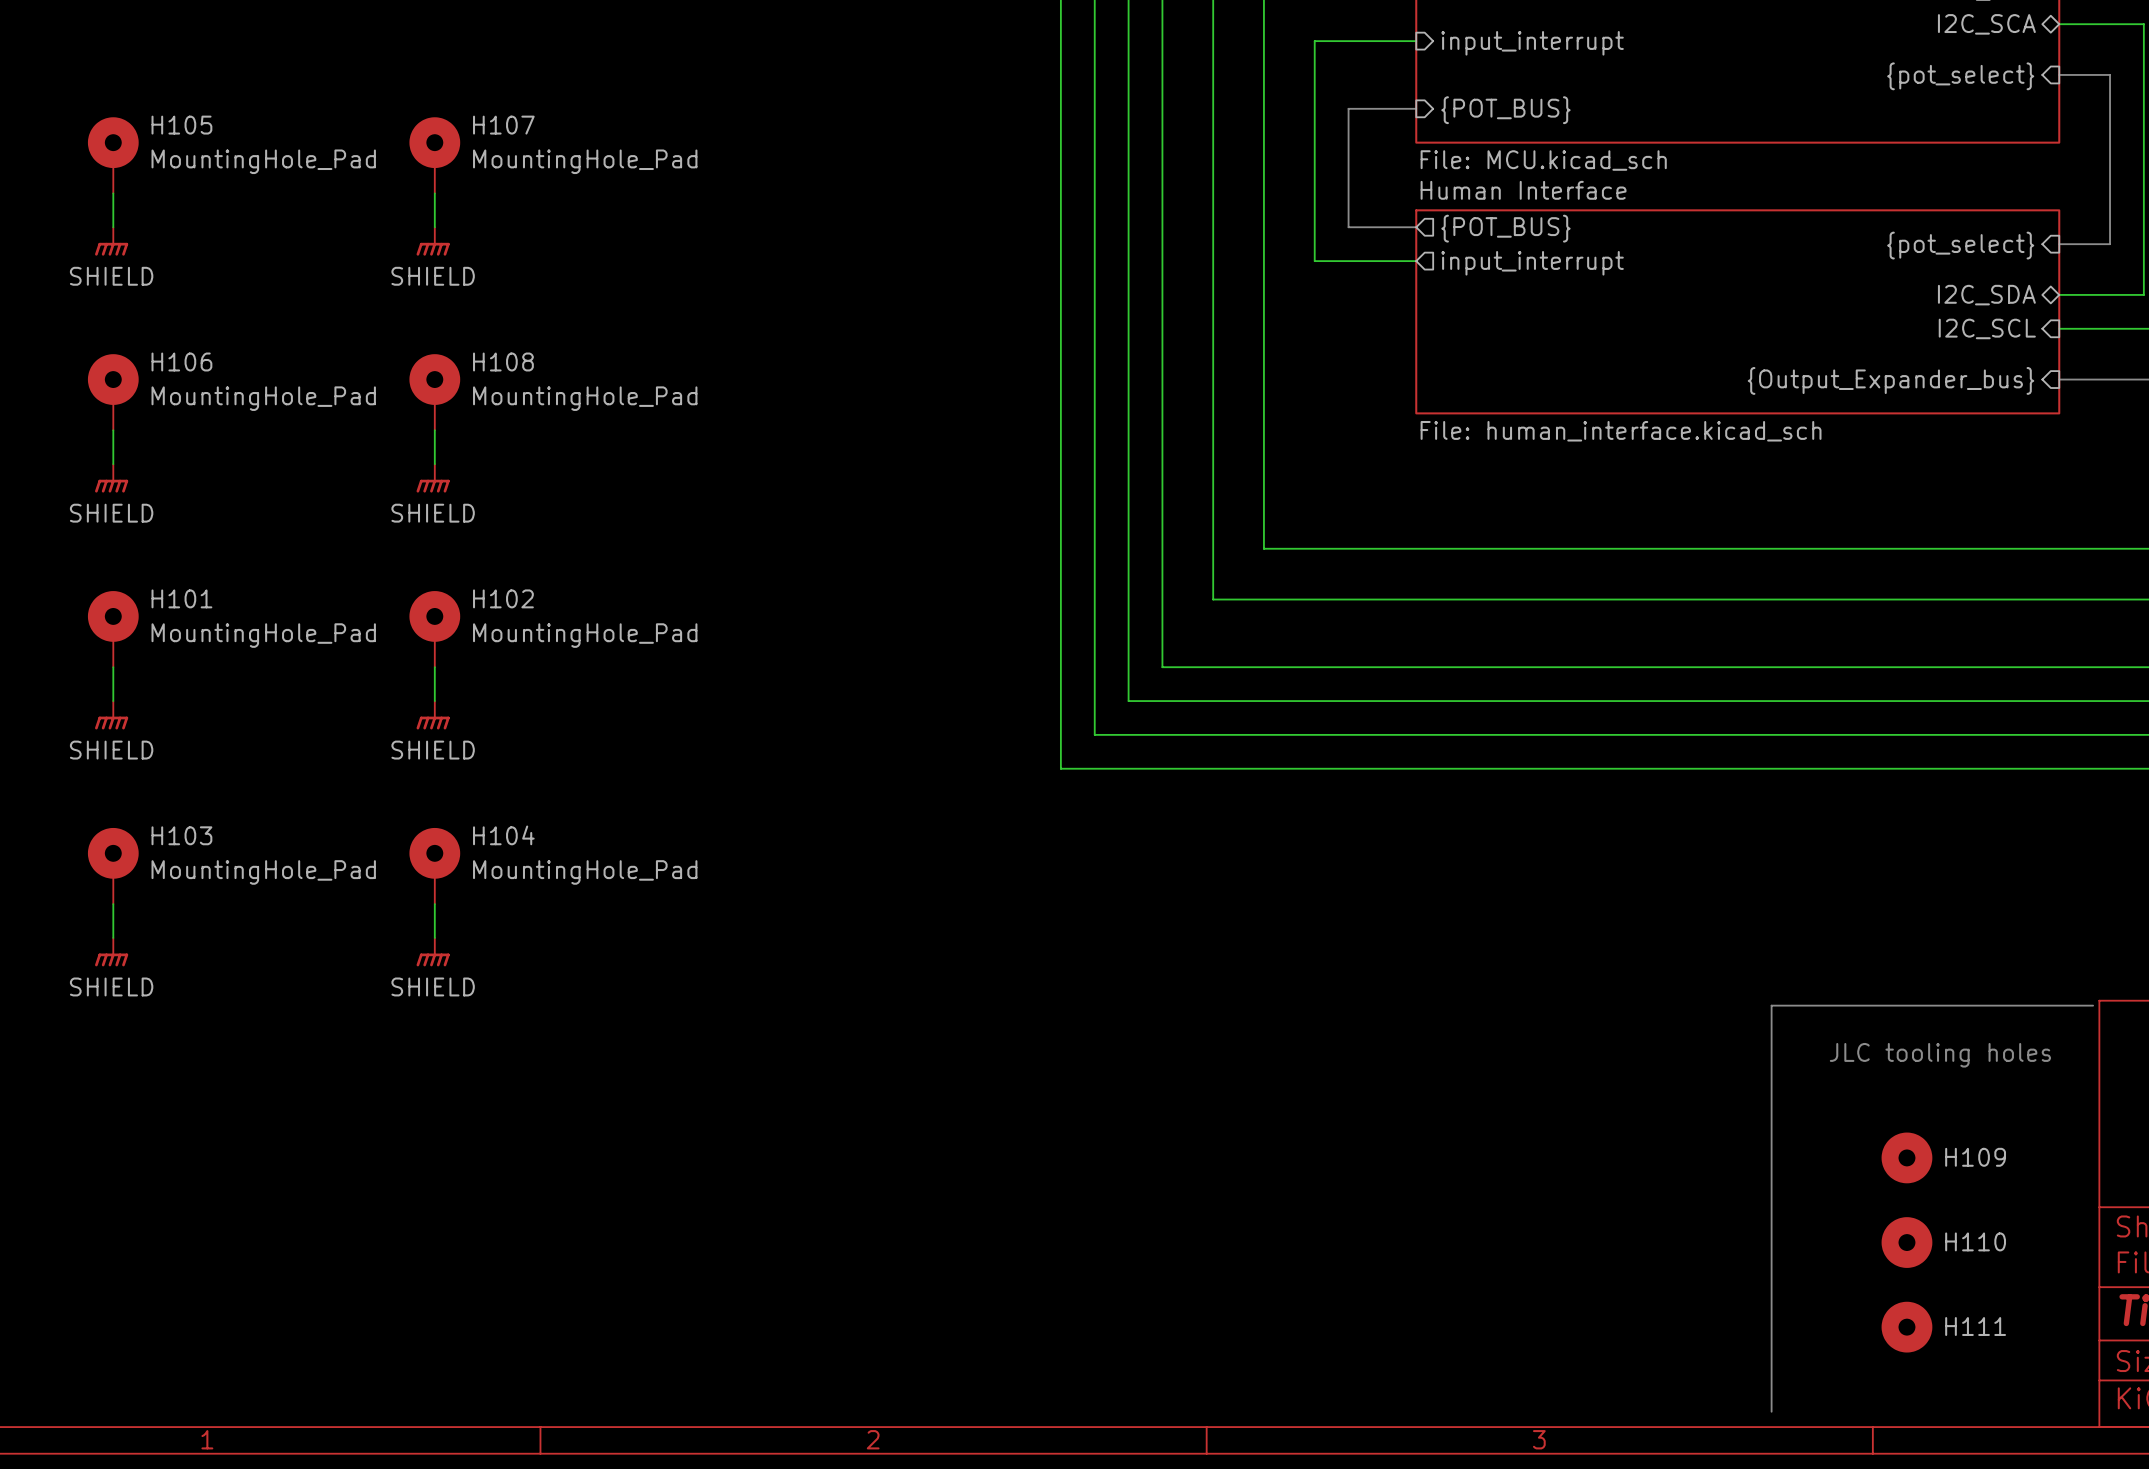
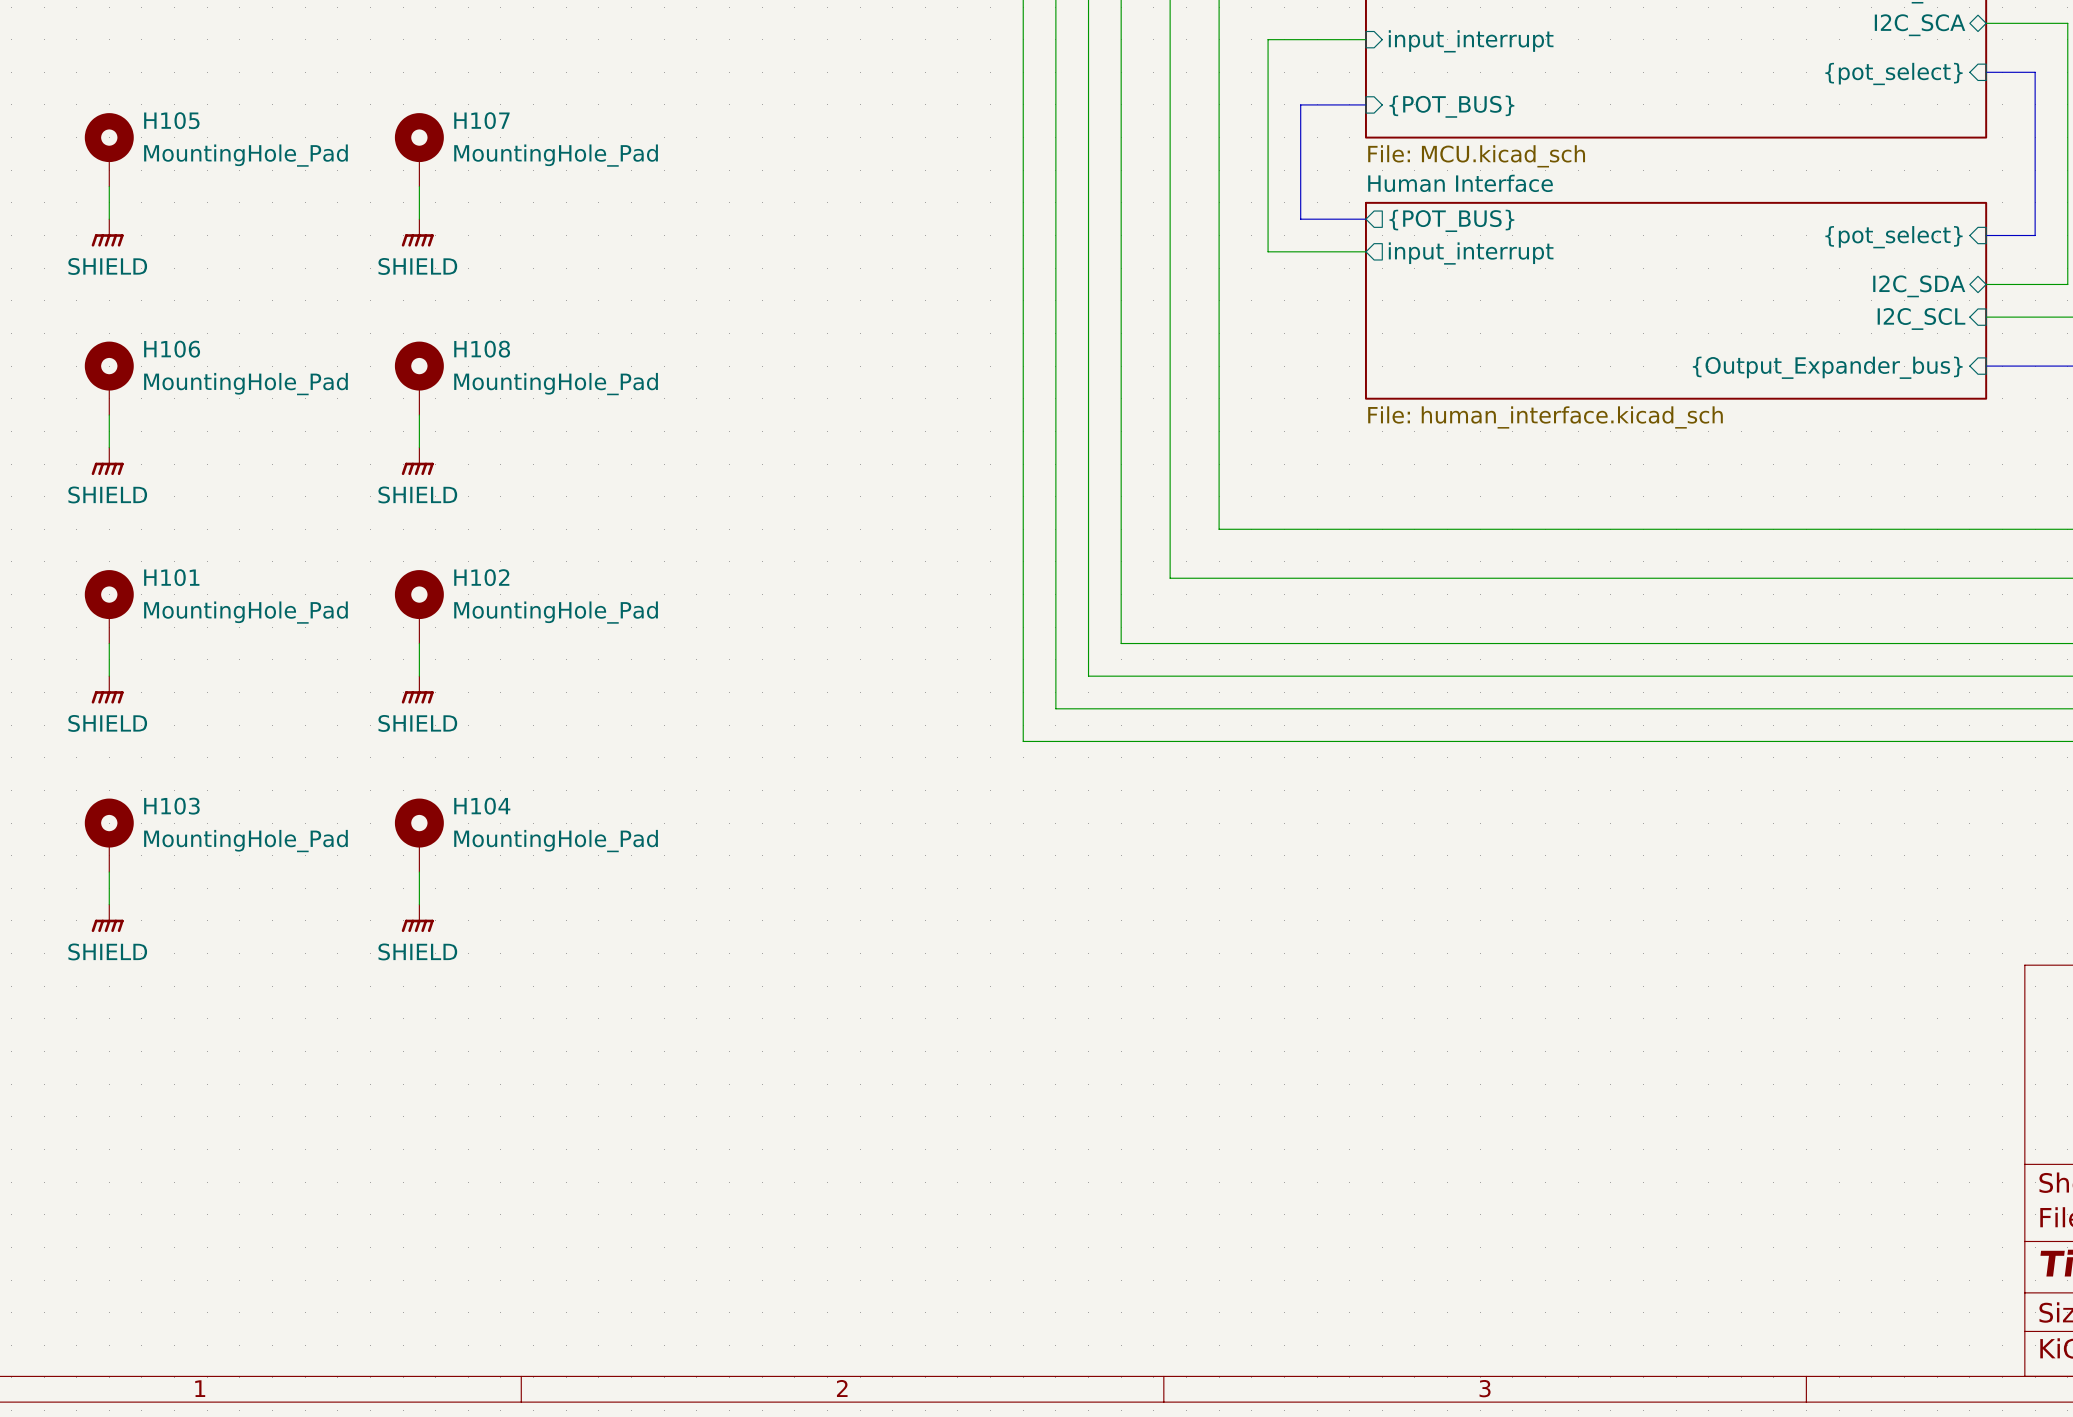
line: (2093, 1005) (1771, 1005) (1771, 1411) -> none
text: JLC tooling holes (1940, 1055) -> none
H109: (1906, 1157) -> none
H110: (1906, 1242) -> none
H111: (1906, 1327) -> none

